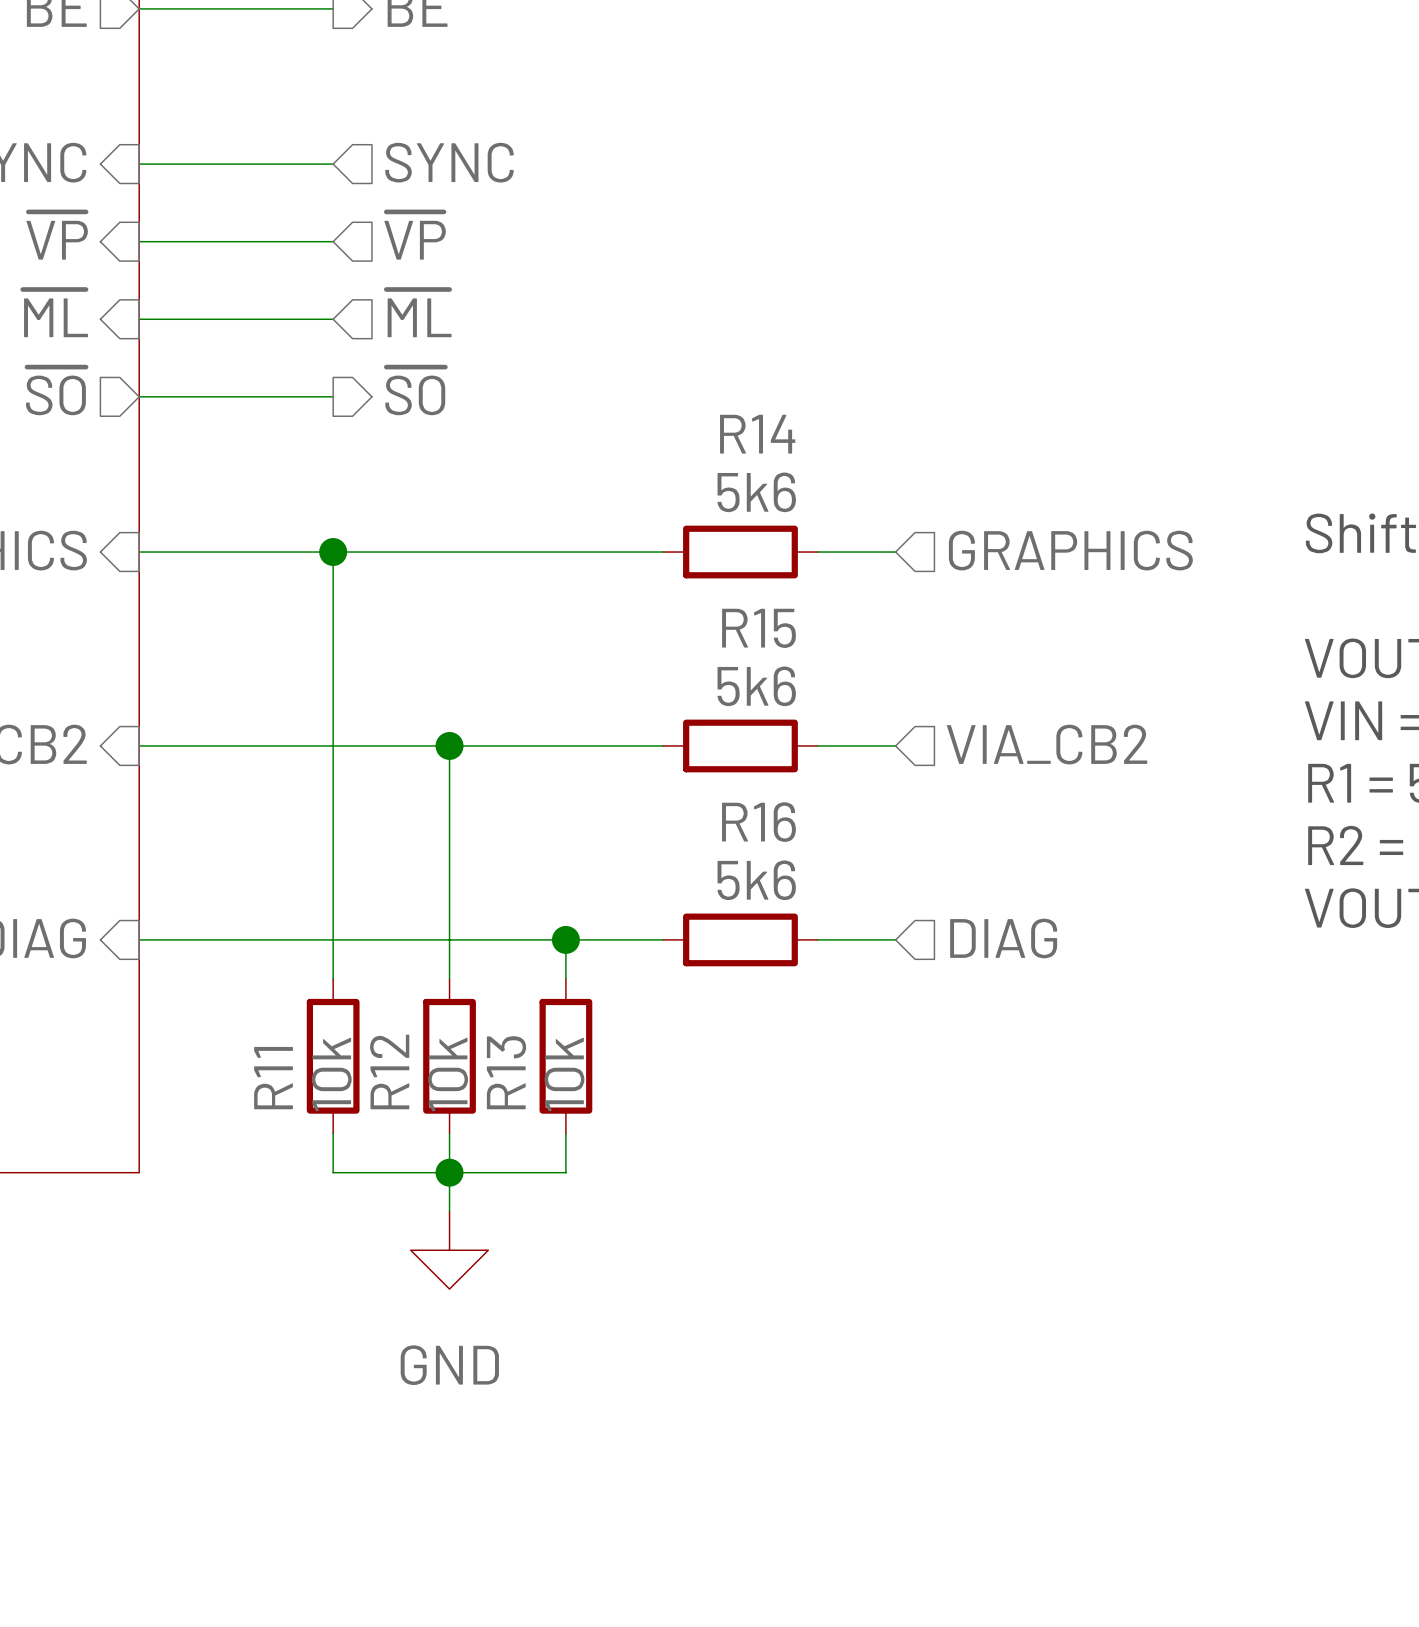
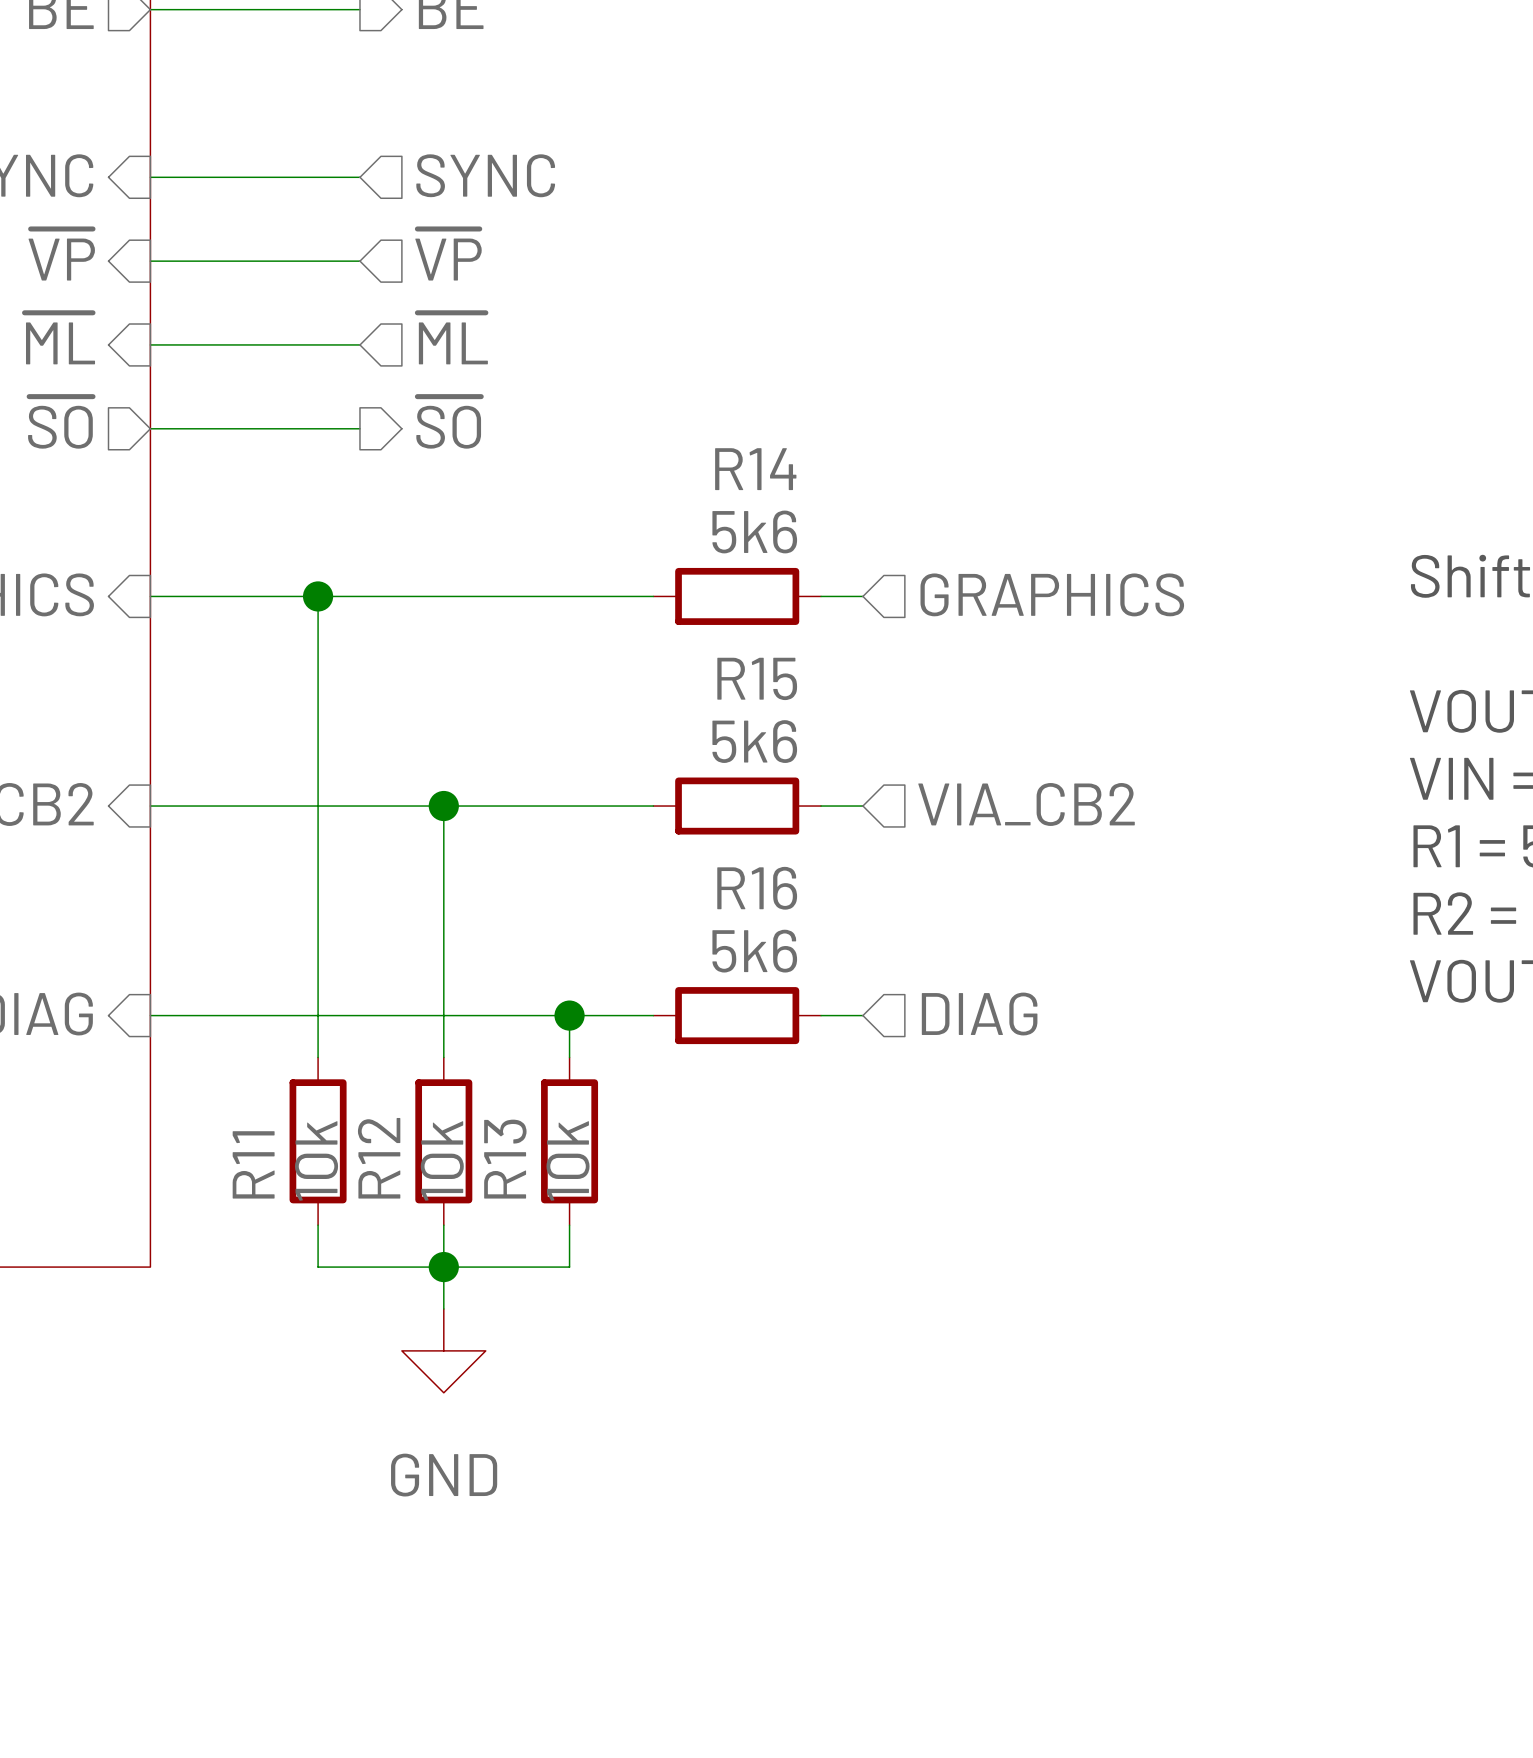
hierarchical label position: GRAPHICS (1070, 550) -> GRAPHICS (1052, 594)
wire: (333, 552) (333, 978) -> (318, 596) (318, 1057)
junction position: (333, 552) -> (318, 596)
wire: (604, 552) (662, 552) -> none
R14 position: (740, 552) -> (737, 596)
wire: none -> (821, 596) (862, 596)
wire: (818, 552) (895, 552) -> none
hierarchical label position: VIA_CB2 (1047, 744) -> VIA_CB2 (1026, 804)
wire: (449, 745) (449, 978) -> (443, 806) (443, 1057)
junction position: (449, 745) -> (443, 806)
wire: (604, 745) (662, 745) -> none
R15 position: (740, 745) -> (737, 806)
wire: none -> (821, 806) (862, 806)
wire: (818, 745) (895, 745) -> none
hierarchical label position: DIAG (1003, 938) -> DIAG (979, 1014)
wire: (565, 939) (565, 978) -> (569, 1015) (569, 1057)
junction position: (565, 939) -> (569, 1015)
wire: (604, 939) (662, 939) -> none
R16 position: (740, 939) -> (737, 1015)
wire: none -> (821, 1015) (862, 1015)
wire: (818, 939) (895, 939) -> none
R11 position: (333, 1056) -> (318, 1141)
R12 position: (449, 1056) -> (443, 1141)
R13 position: (565, 1056) -> (569, 1141)
wire: (333, 1133) (333, 1172) -> (318, 1225) (318, 1267) (359, 1267)
wire: (449, 1133) (449, 1211) -> (443, 1225) (443, 1308)
wire: (565, 1133) (565, 1172) (527, 1172) -> (569, 1225) (569, 1267)
junction position: (449, 1172) -> (443, 1267)
power symbol position: GND (449, 1250) -> GND (443, 1350)

